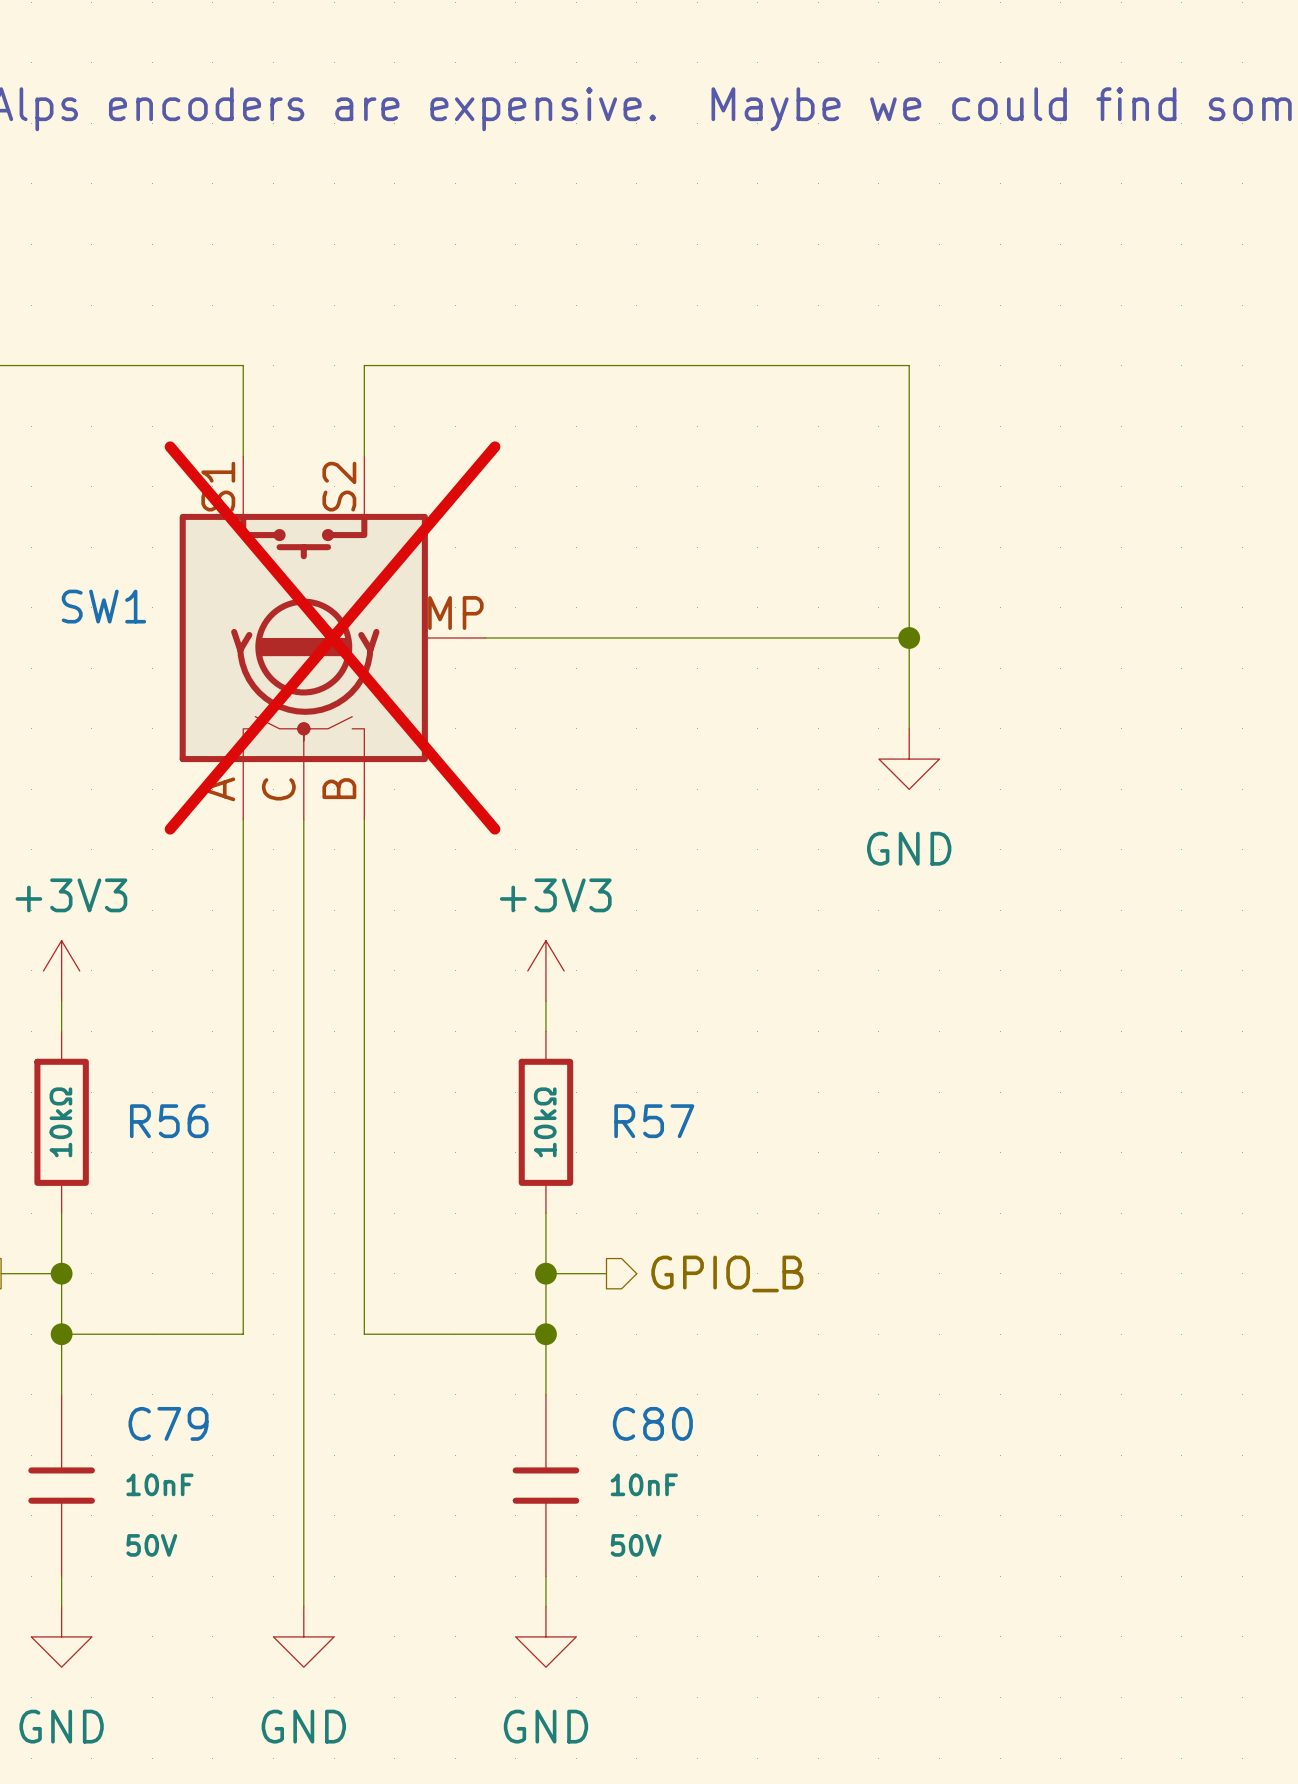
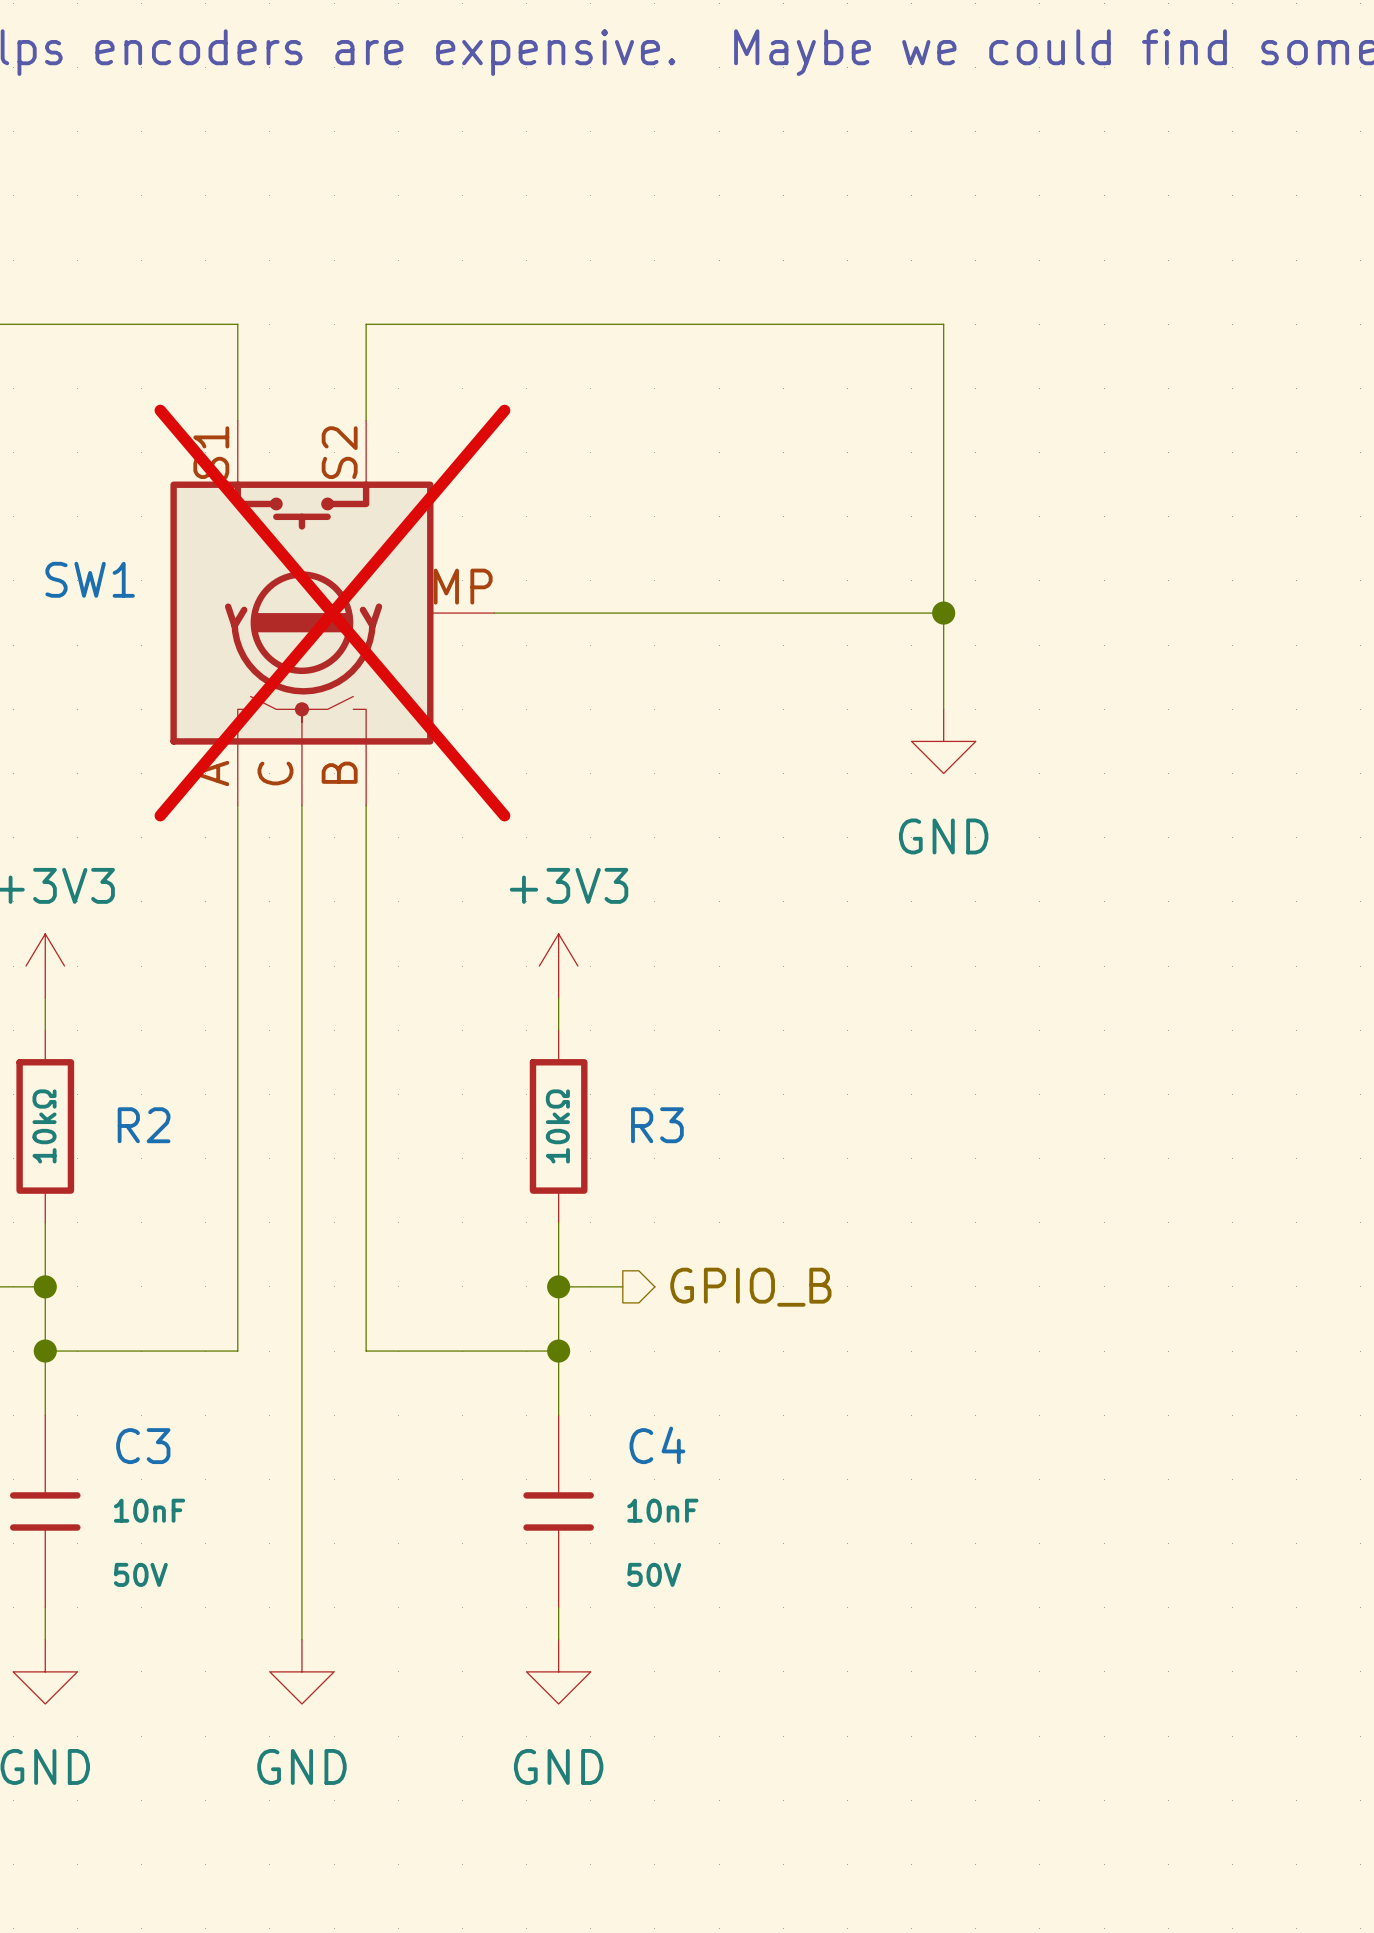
R56 name: R56 (169, 1121) -> R2 (144, 1125)
R57 name: R57 (654, 1121) -> R3 (657, 1125)
C79 name: C79 (168, 1423) -> C3 (143, 1446)
C80 name: C80 (652, 1423) -> C4 (657, 1445)

